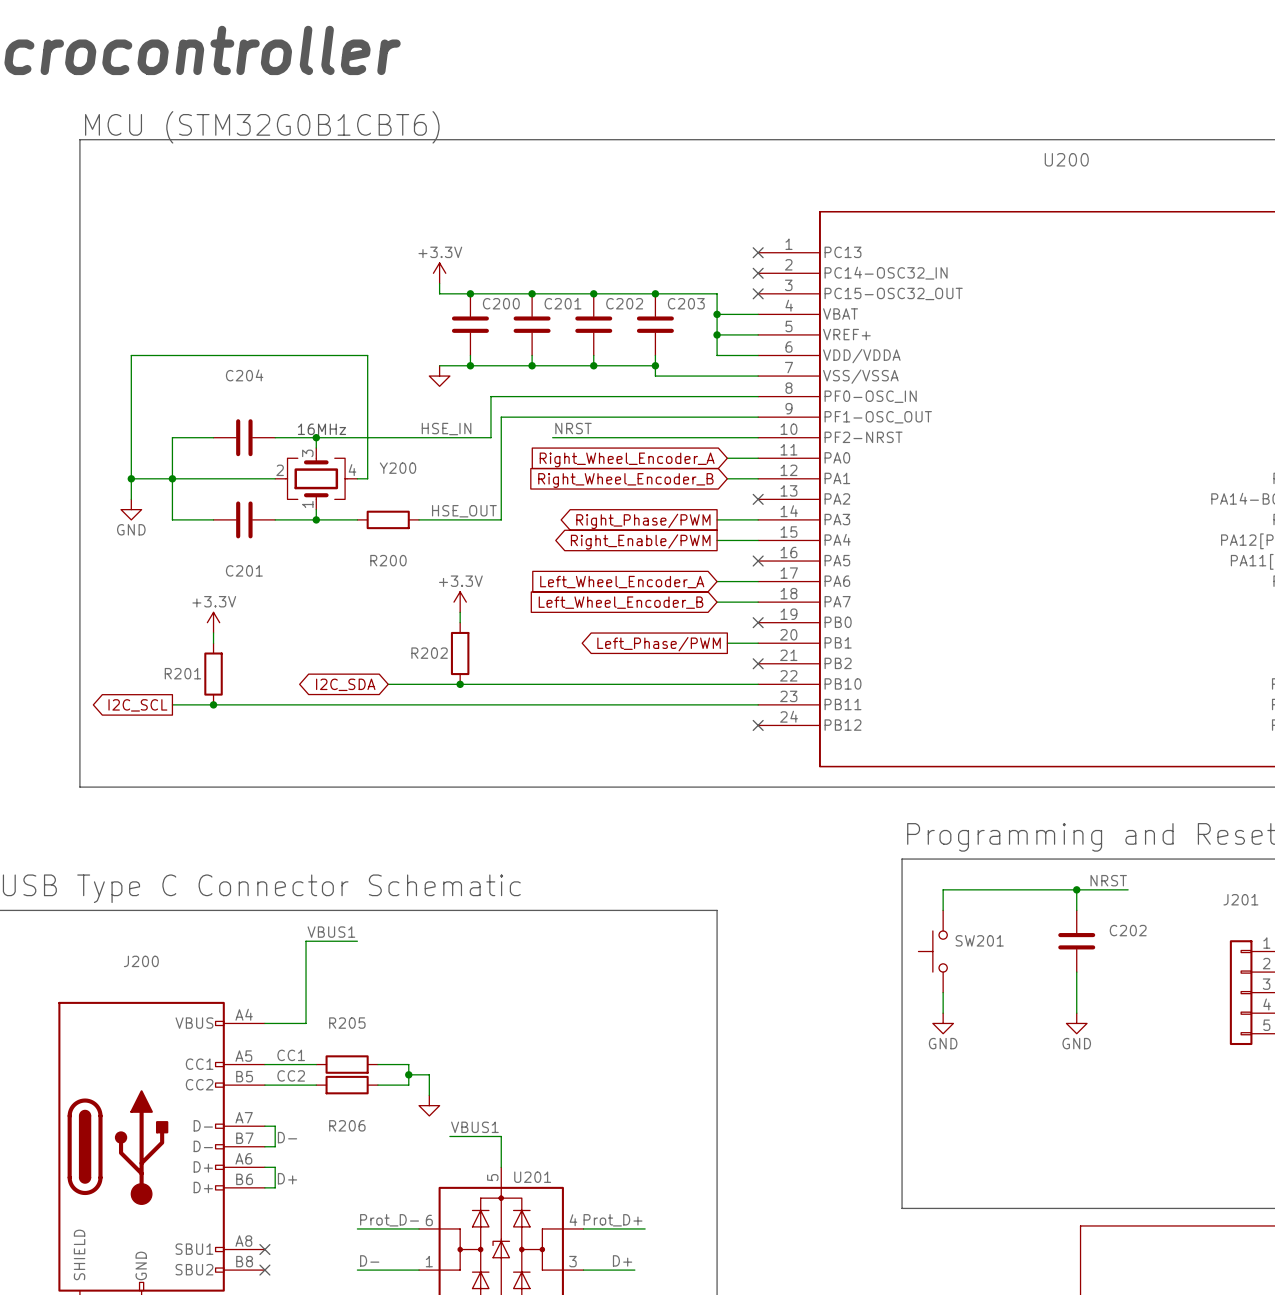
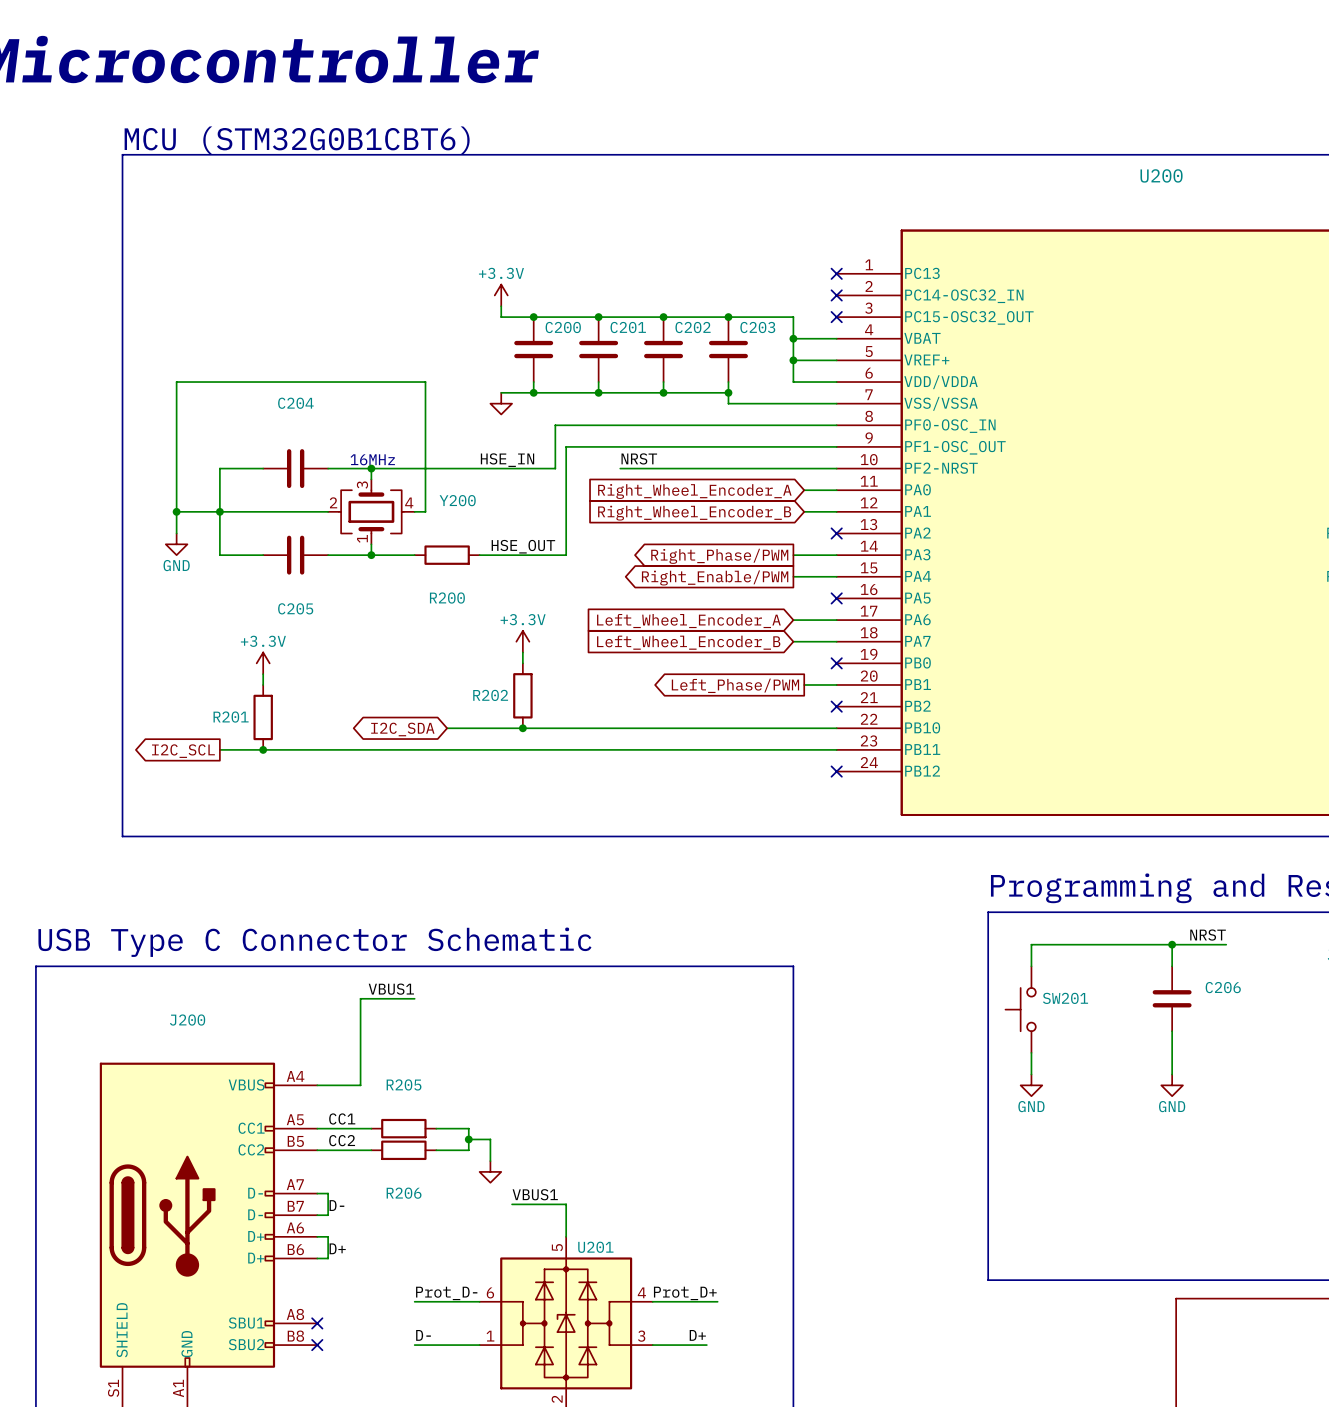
C201 name: C201 (244, 570) -> C205 (295, 608)
C202 name: C202 (1128, 930) -> C206 (1223, 987)

